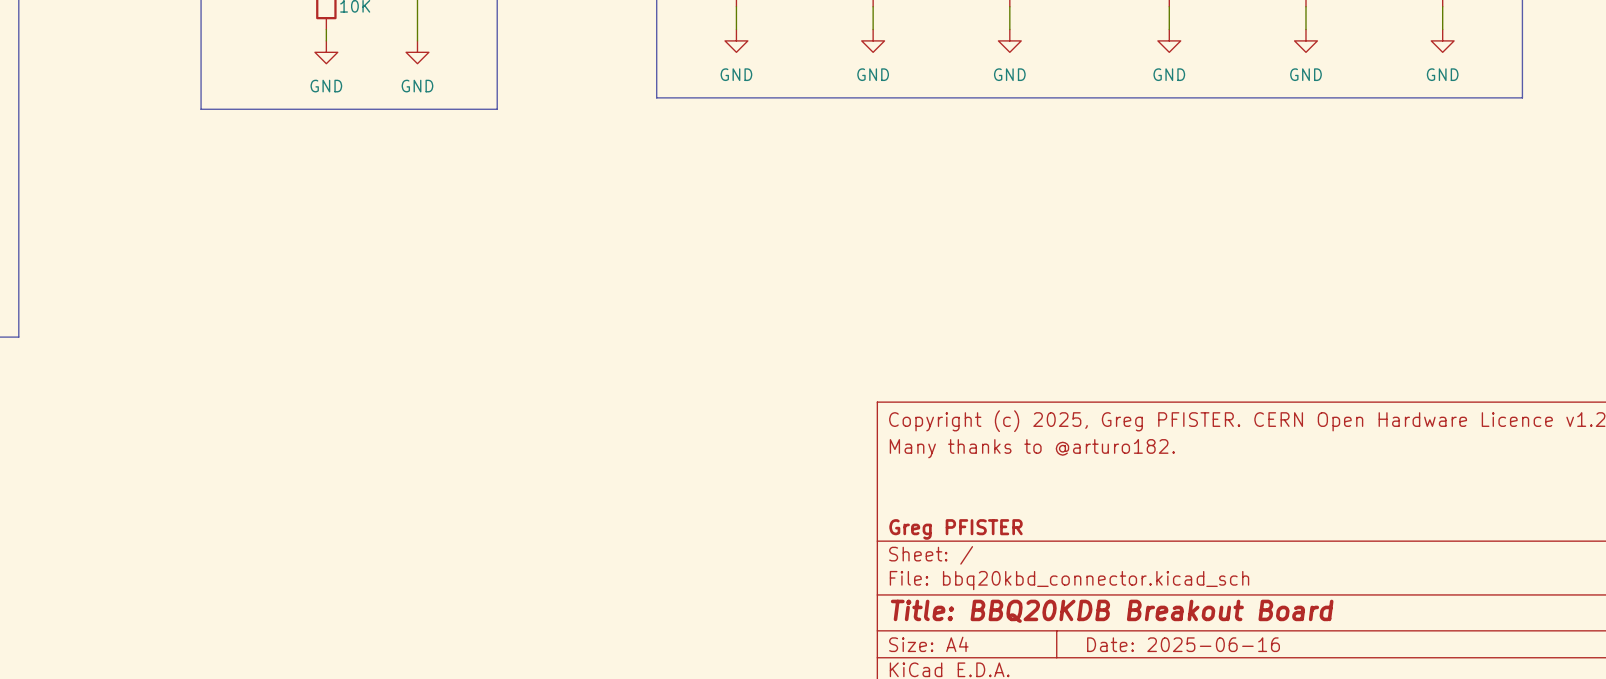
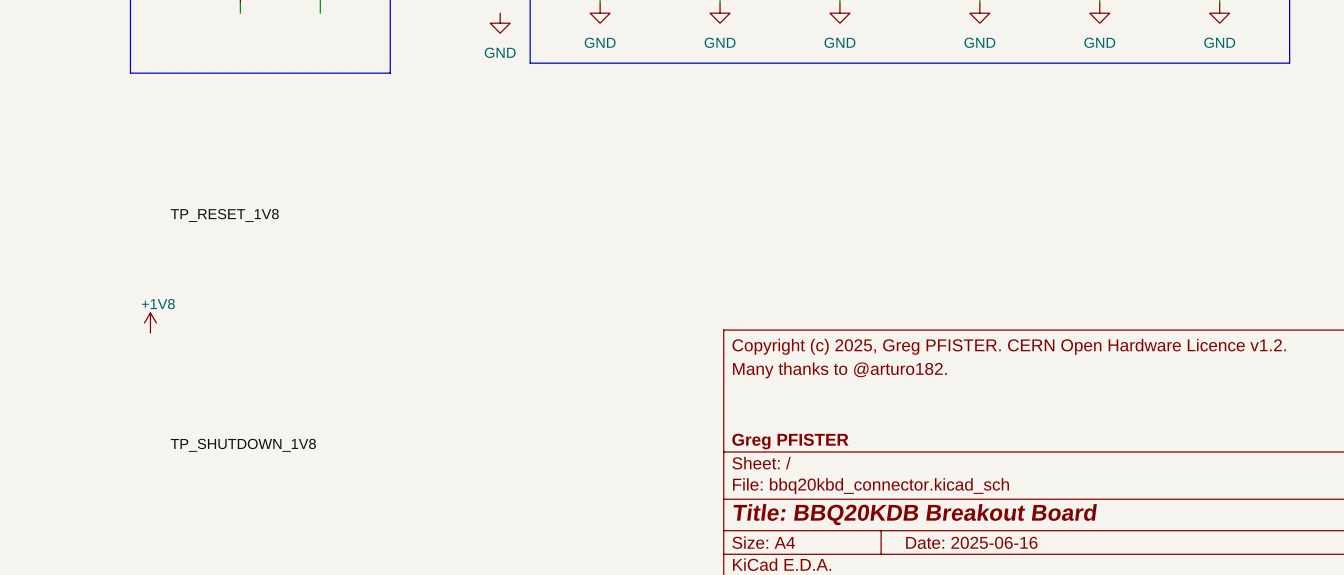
power symbol: GND (326, 52) -> none
power symbol: GND (417, 52) -> none
power symbol: none -> GND (500, 23)
label: none -> TP_RESET_1V8 (224, 215)
power symbol: none -> +1V8 (150, 322)
label: none -> TP_SHUTDOWN_1V8 (243, 445)

